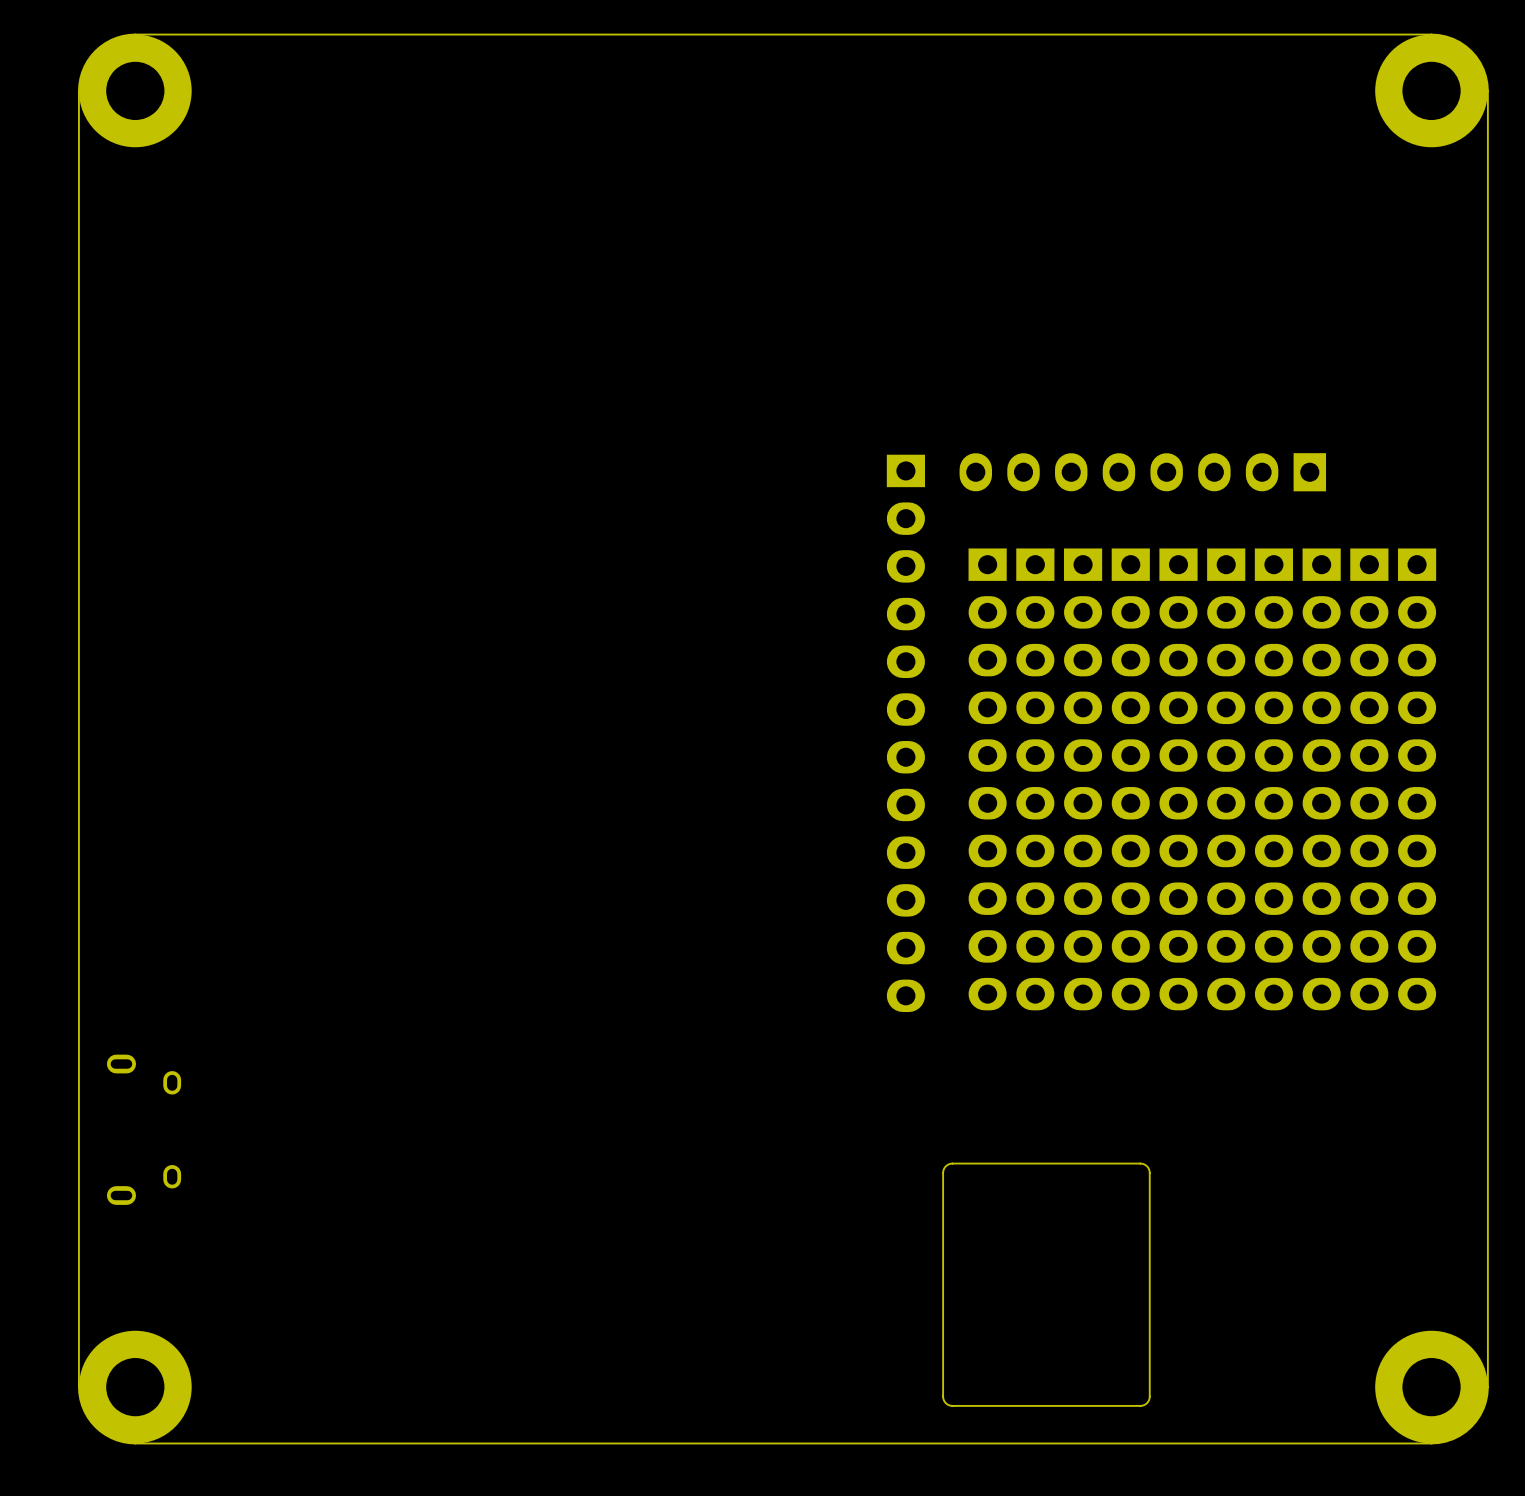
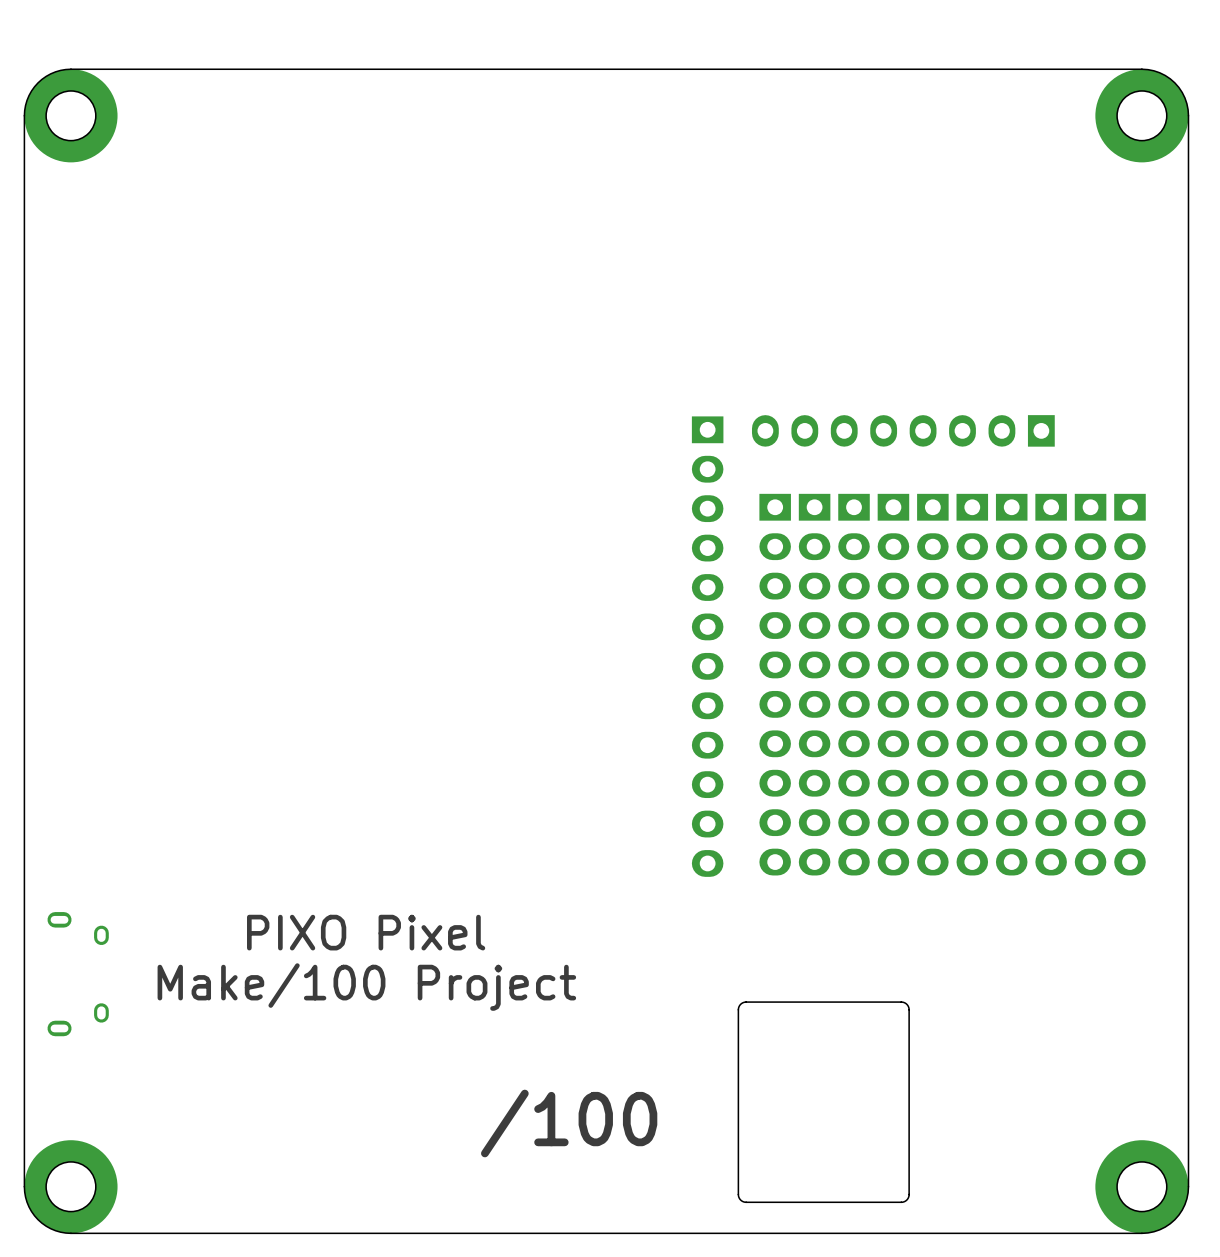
text: none -> PIXO Pixel (366, 932)
text: none -> Make/100 Project (366, 987)
text: none -> /100 (569, 1123)

